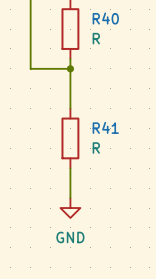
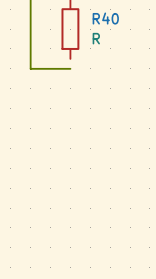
wire: (70, 58) (70, 108) -> none
junction: (70, 68) -> none
R41: R (70, 138) -> none
wire: (70, 168) (70, 198) -> none
power symbol: GND (70, 208) -> none

